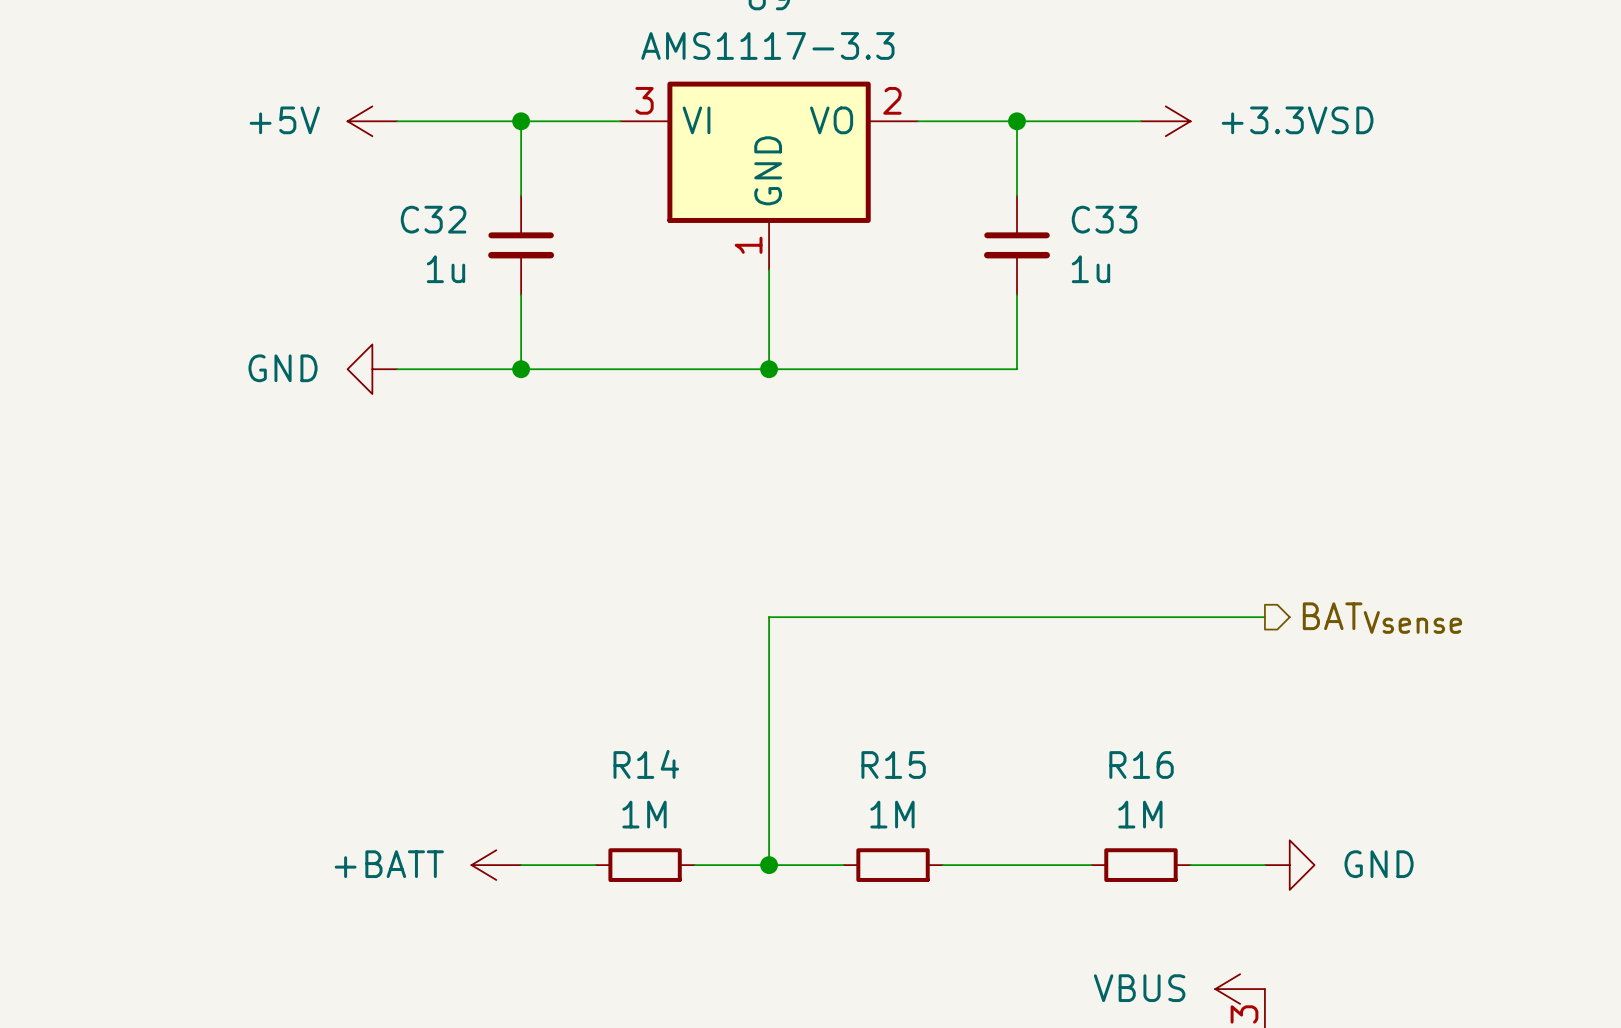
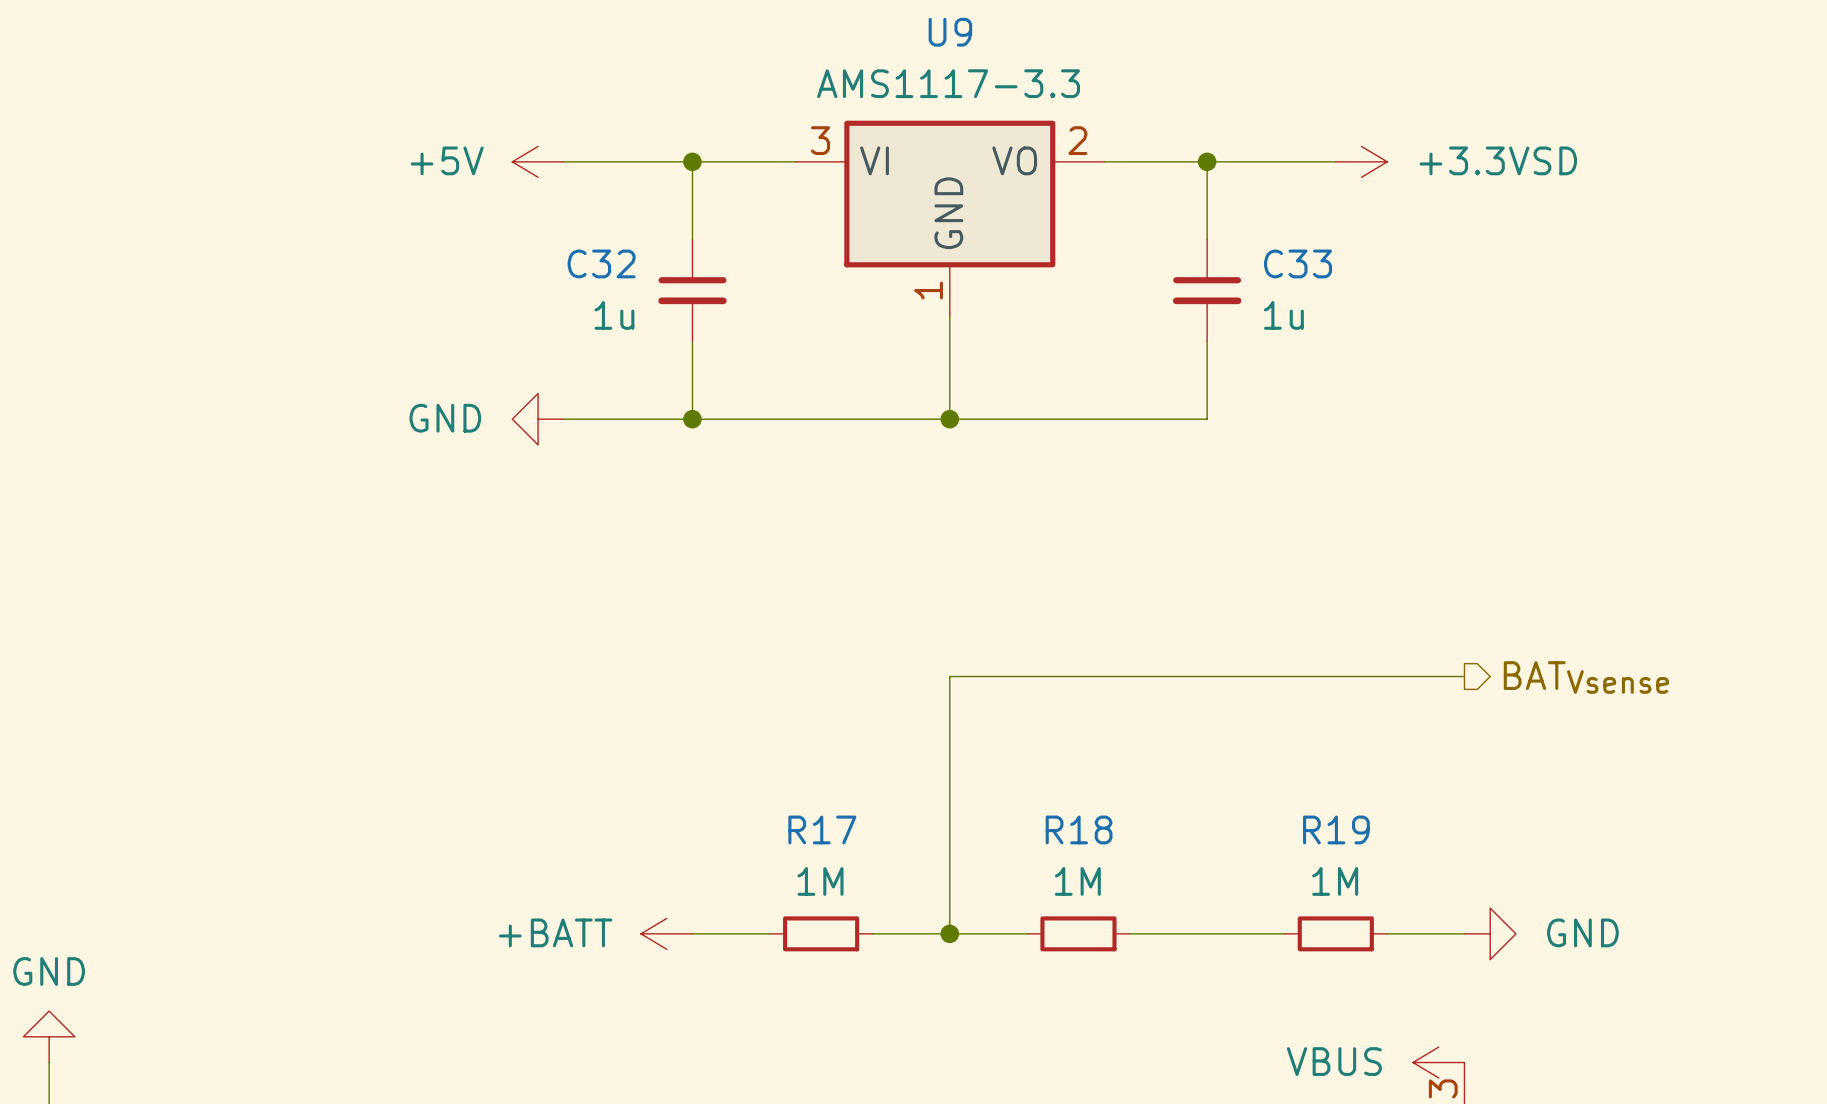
R14 name: R14 (646, 764) -> R17 (822, 829)
R15 name: R15 (893, 765) -> R18 (1079, 829)
R16 name: R16 (1141, 765) -> R19 (1336, 829)

